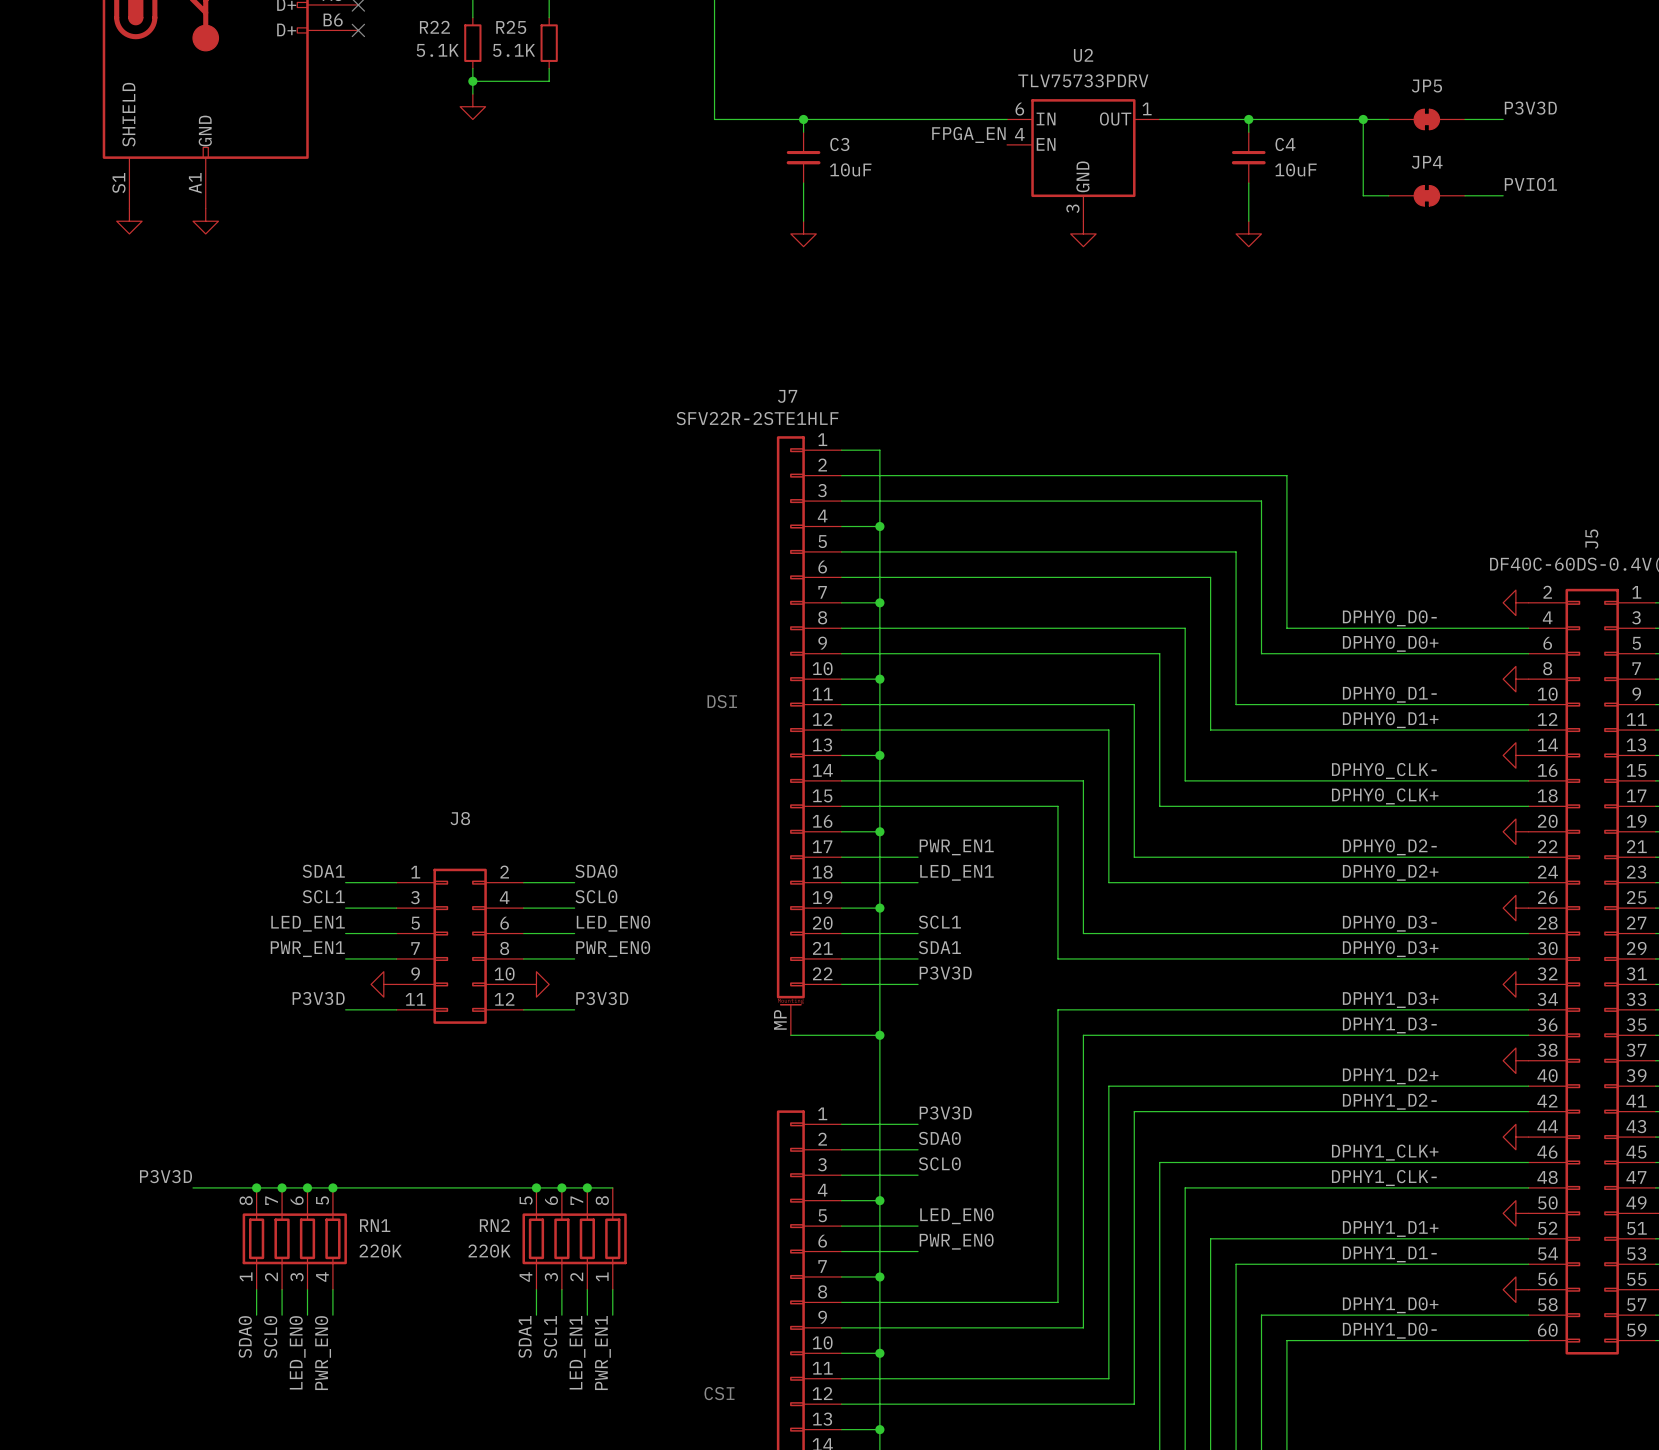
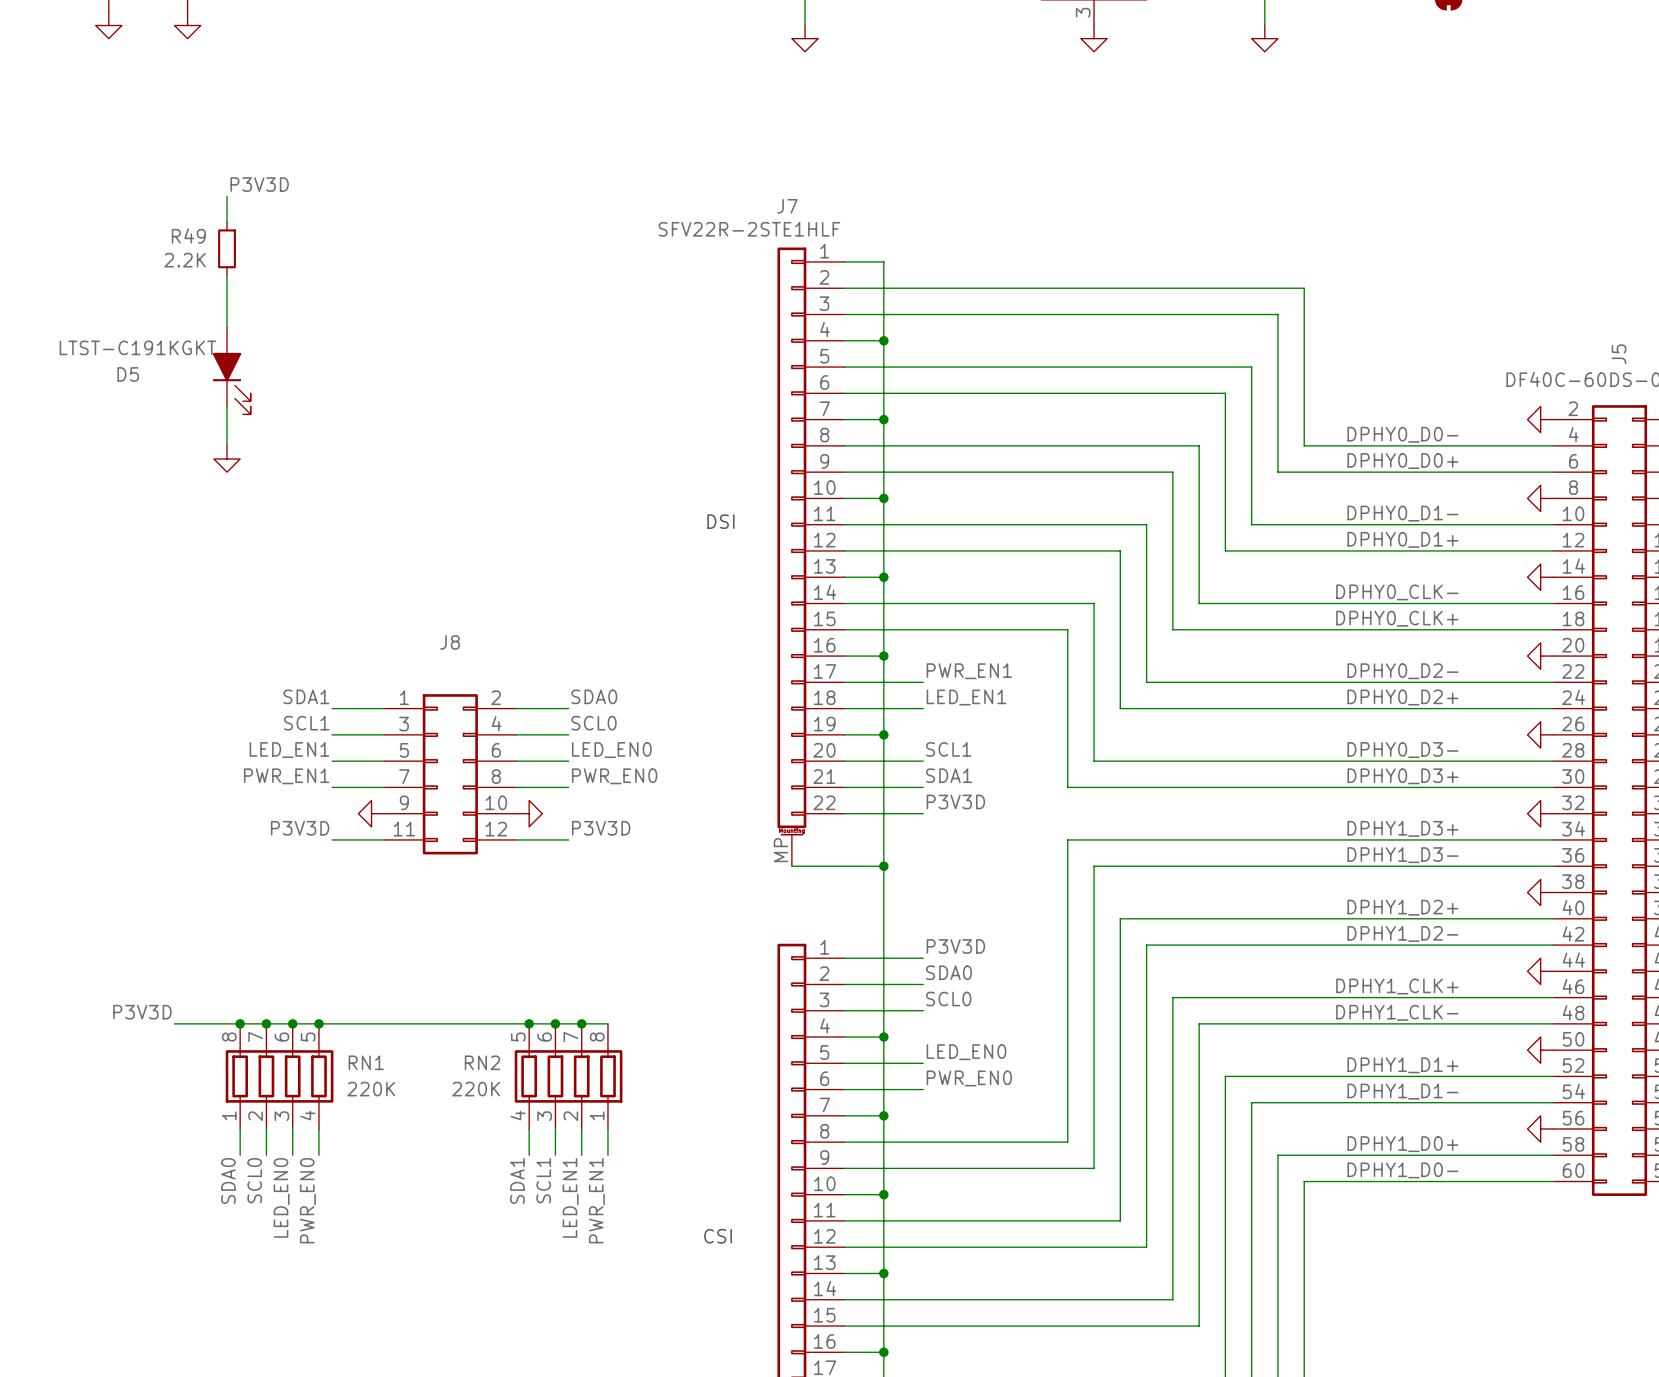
label: none -> P3V3D (259, 184)
wire: none -> (227, 196) (227, 222)
R49: none -> 2.2K (227, 248)
wire: none -> (227, 275) (227, 327)
D5: none -> LTST-C191KGKT (231, 370)
wire: none -> (227, 406) (227, 445)
power symbol: none -> (227, 459)

